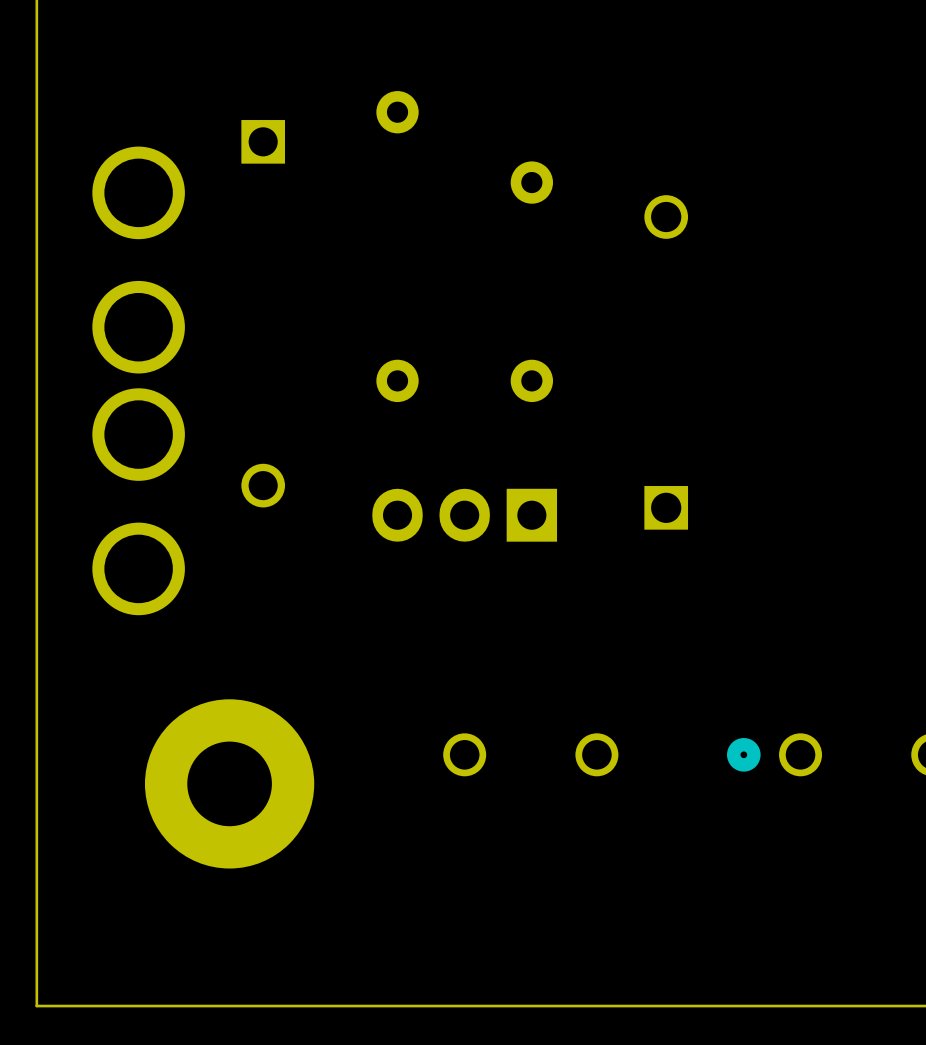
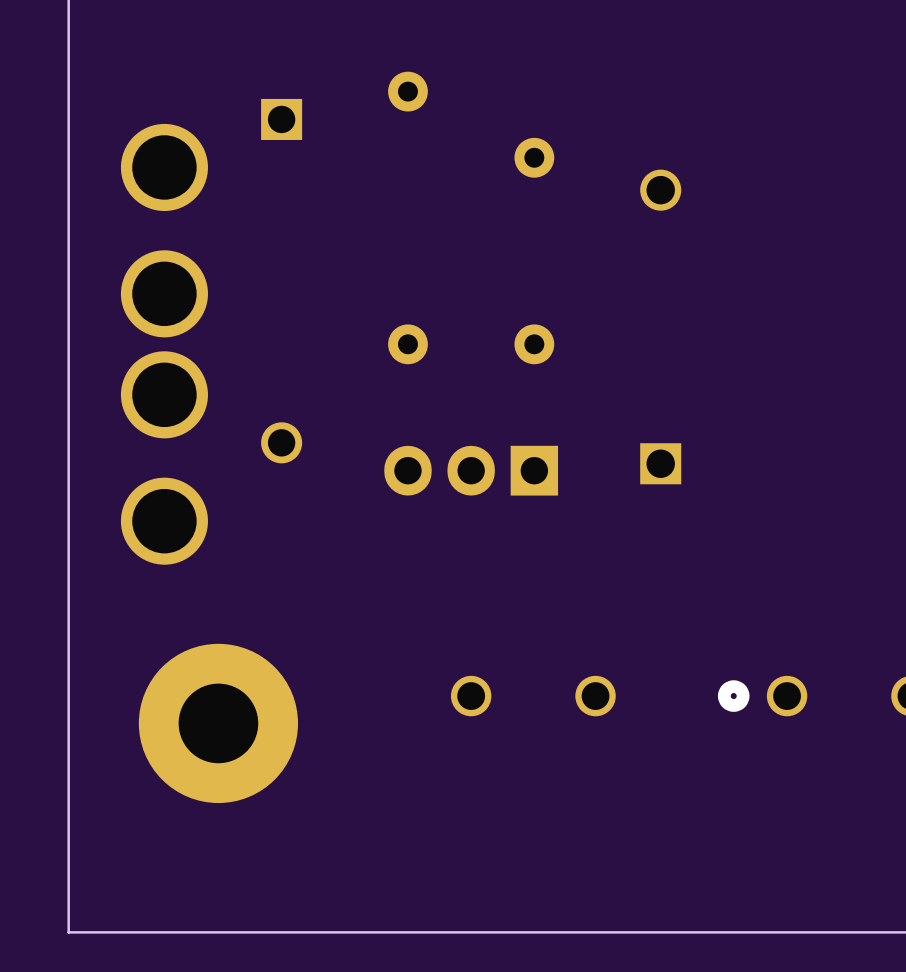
part position: (229, 783) -> (218, 723)

